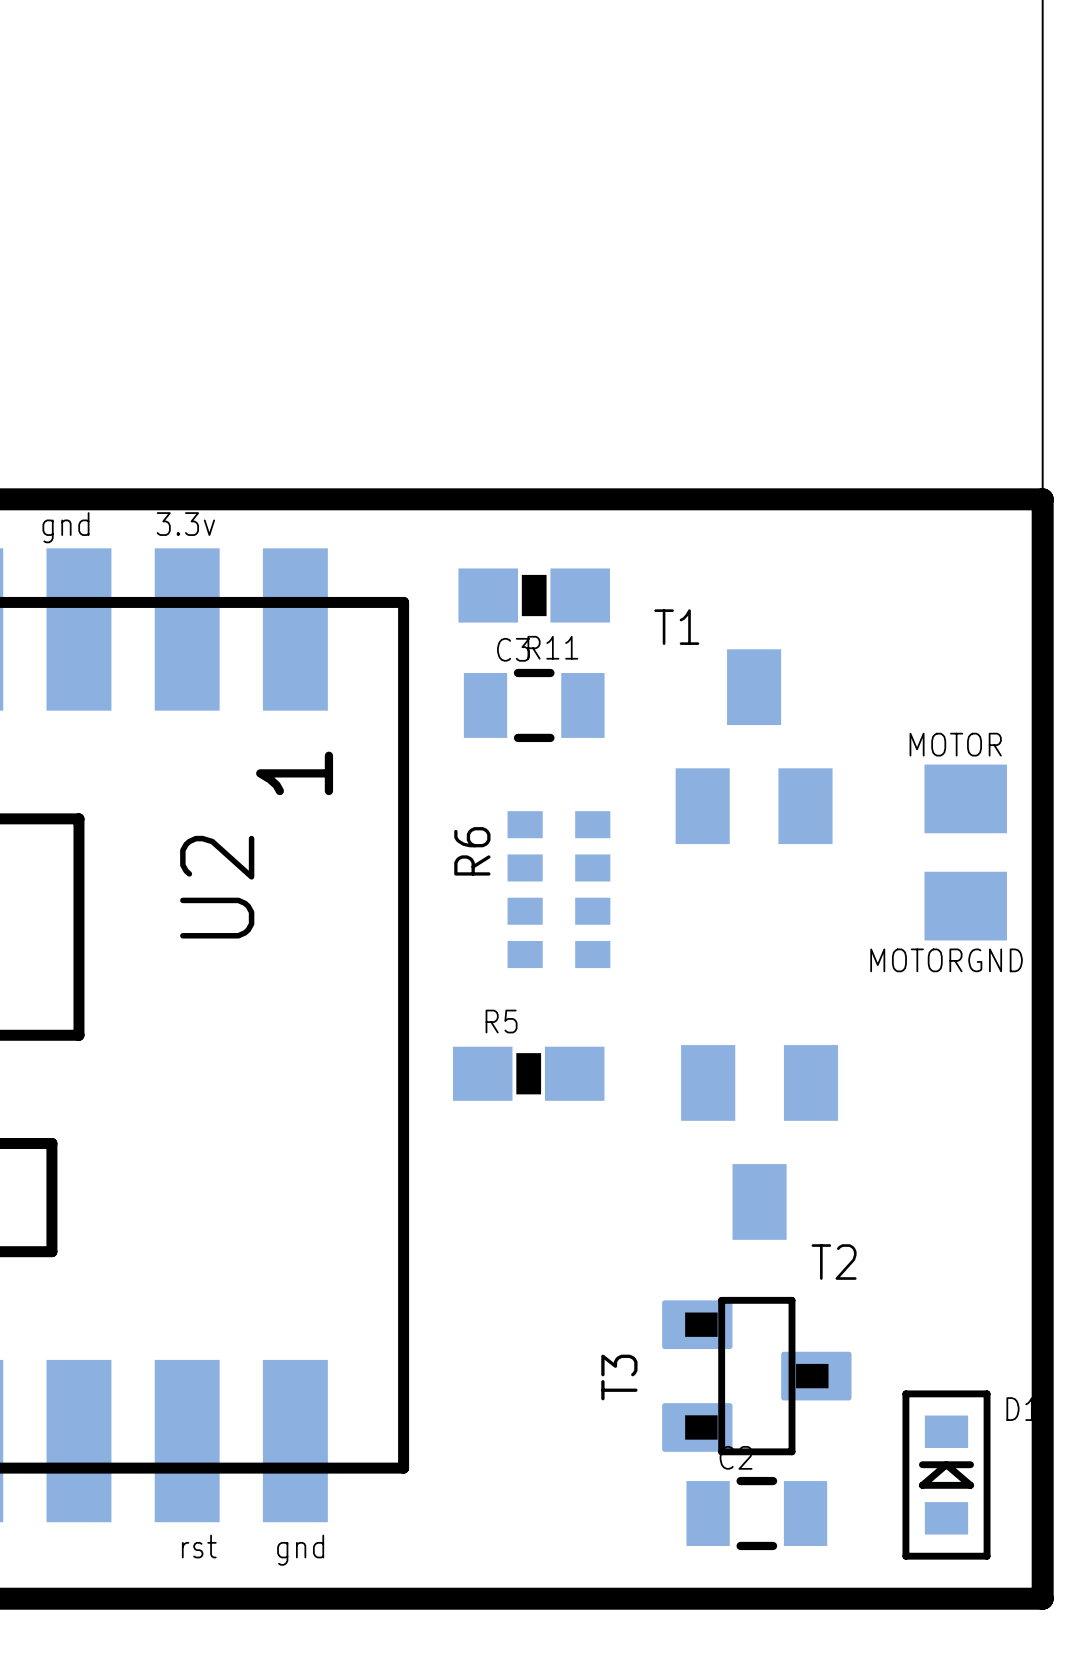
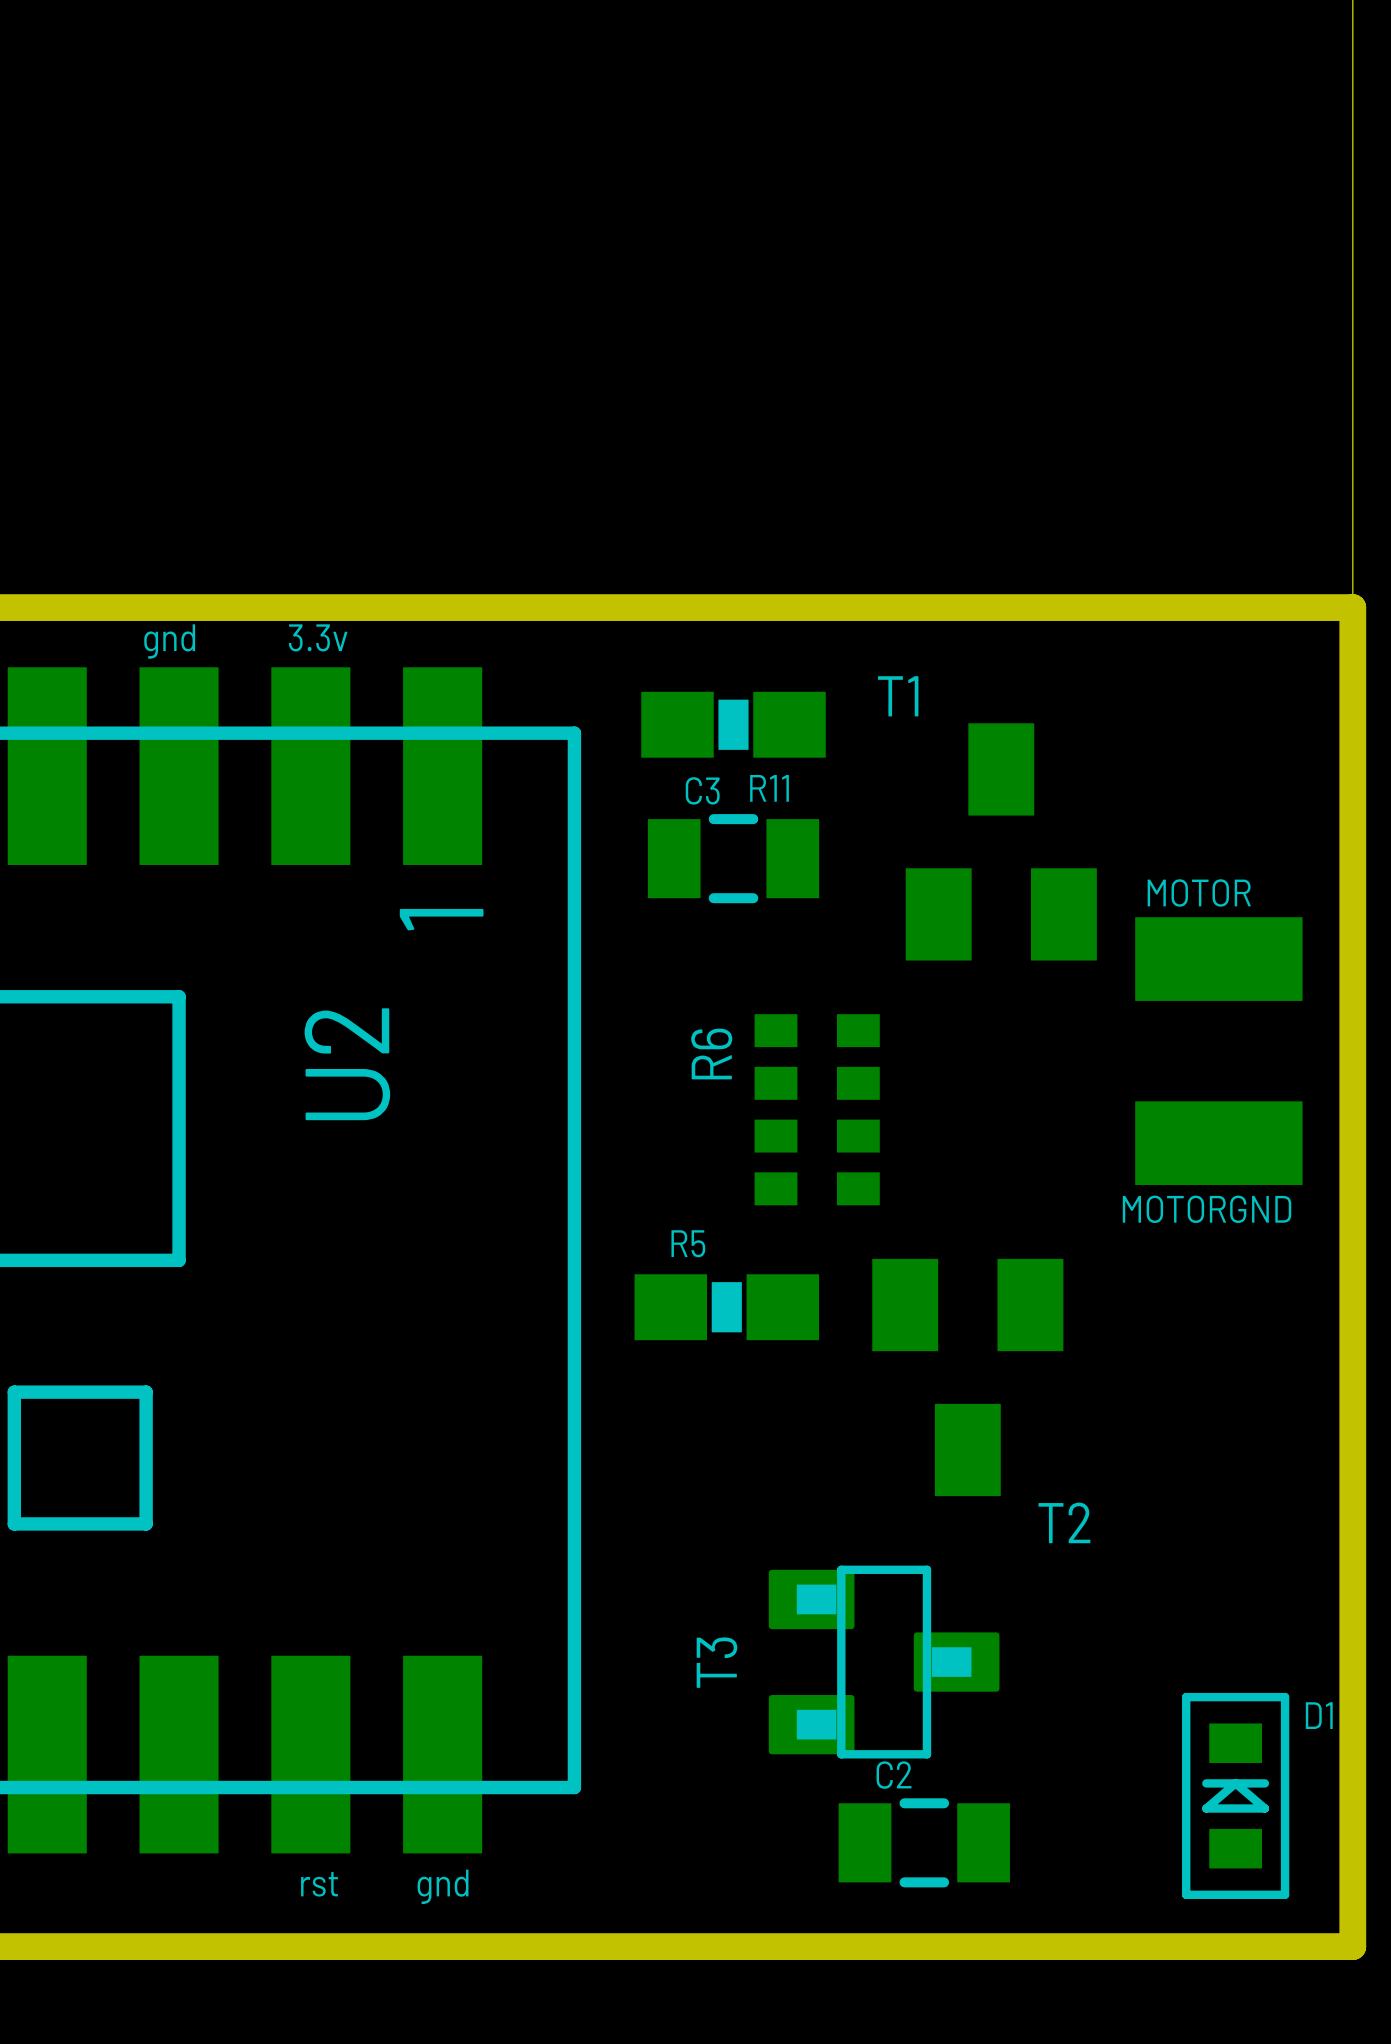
T1 position: (754, 746) -> (1001, 841)
MOTOR footprint: [924, 764, 1007, 834] -> [1135, 917, 1303, 1001]
MOTORGND footprint: [924, 871, 1007, 941] -> [1135, 1101, 1303, 1186]
R6 position: (558, 889) -> (817, 1109)
T2 position: (759, 1142) -> (967, 1377)
T3 position: (756, 1376) -> (884, 1662)
C2 position: (756, 1513) -> (924, 1842)

